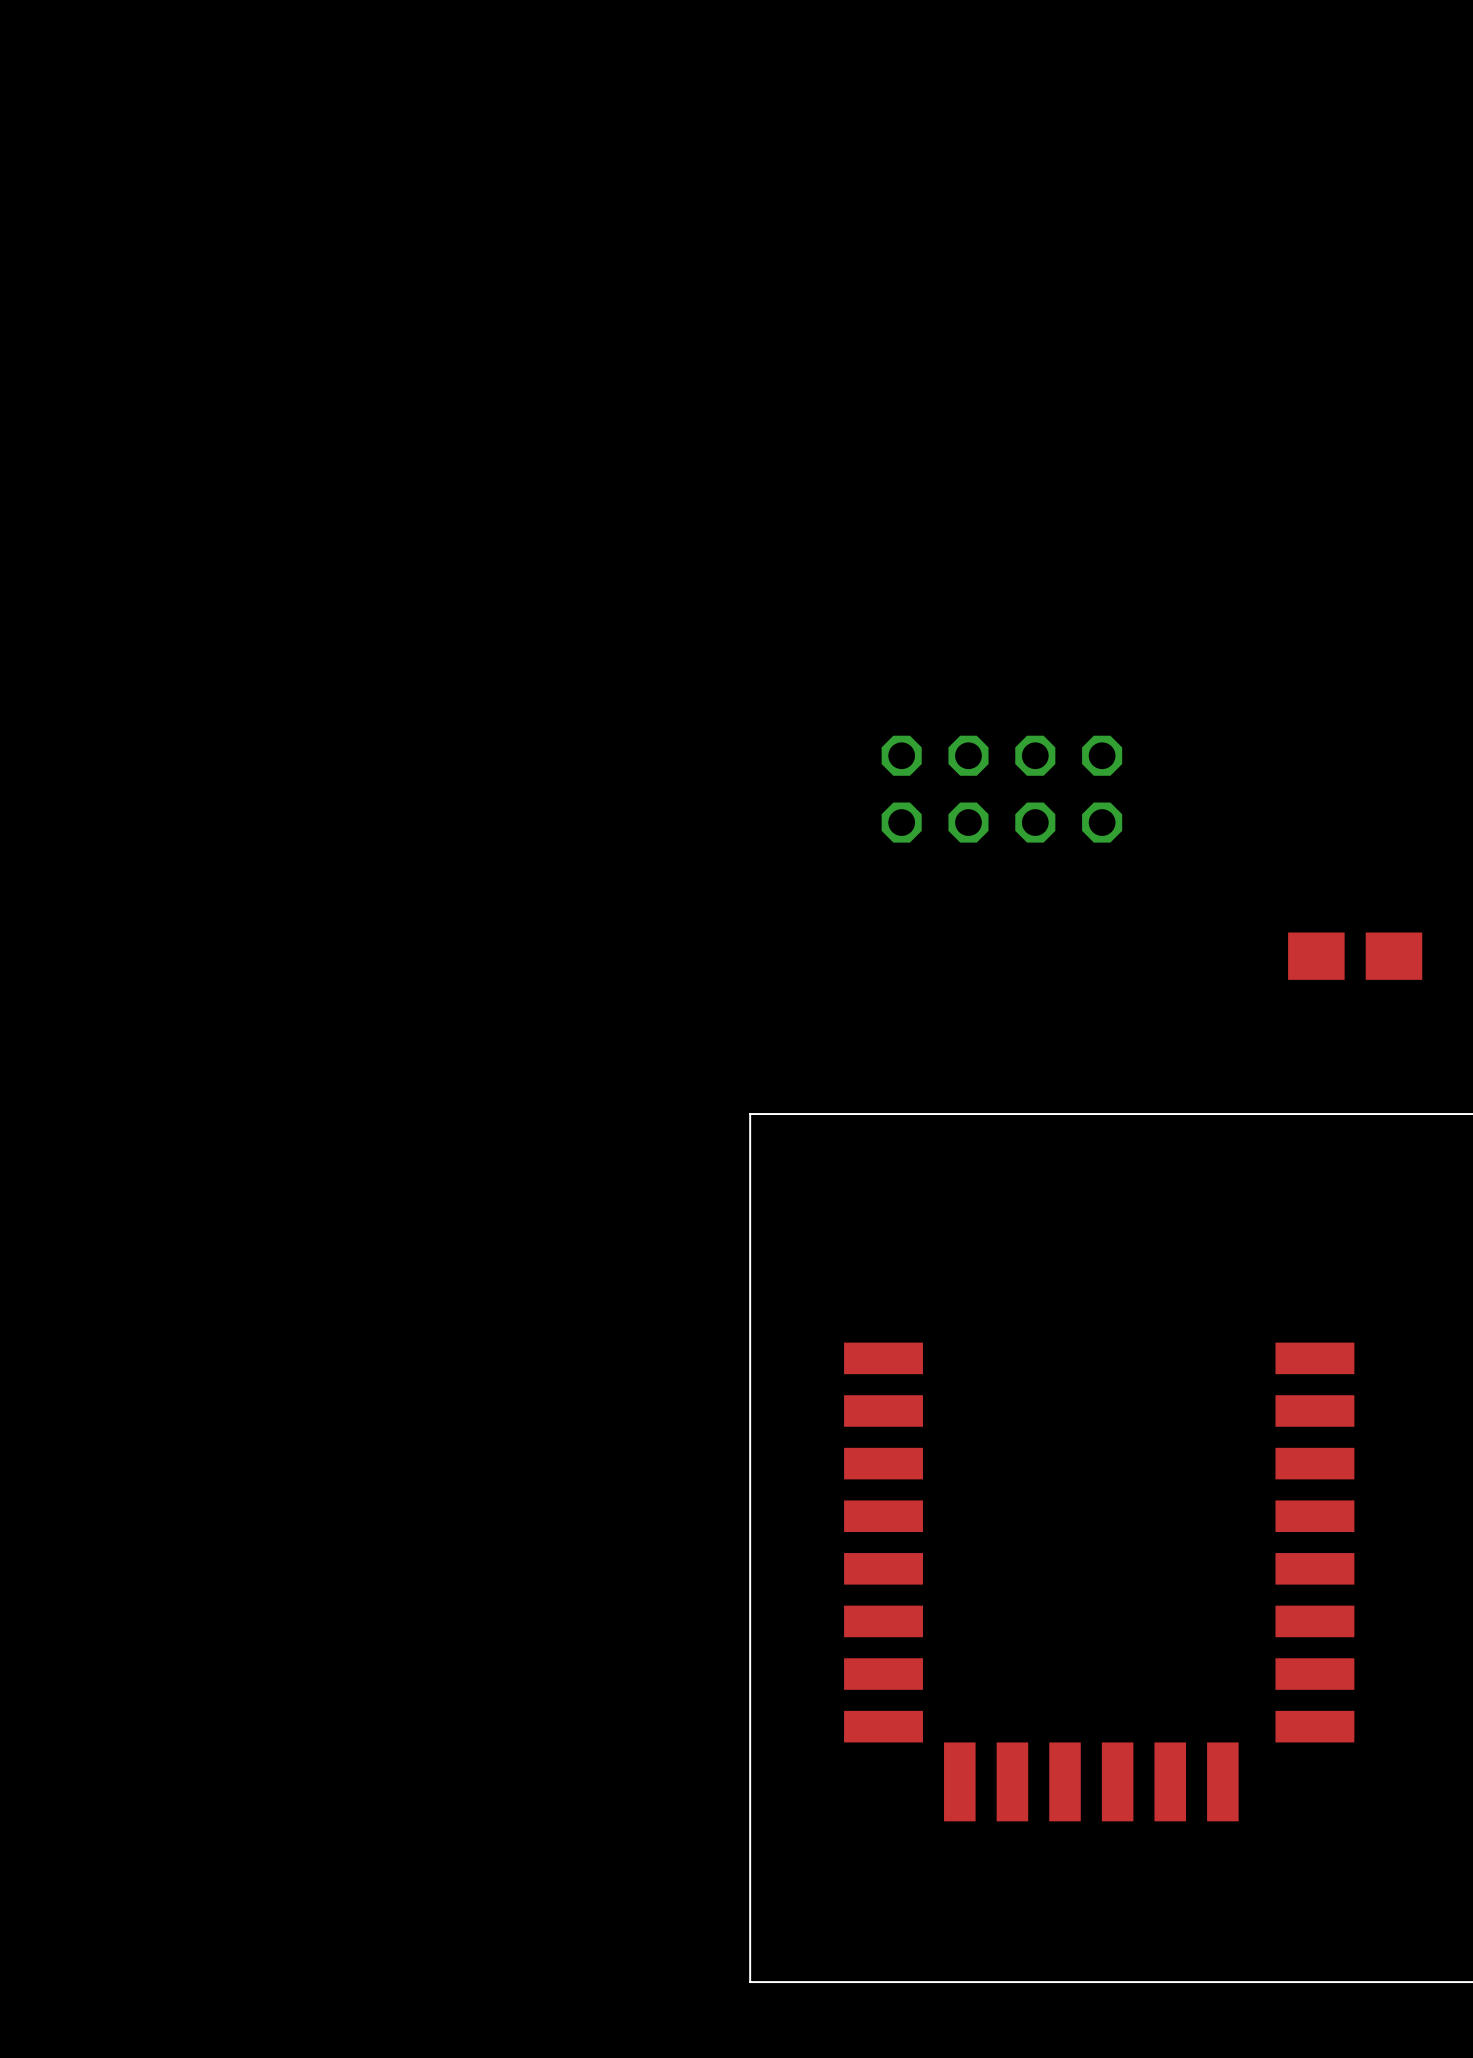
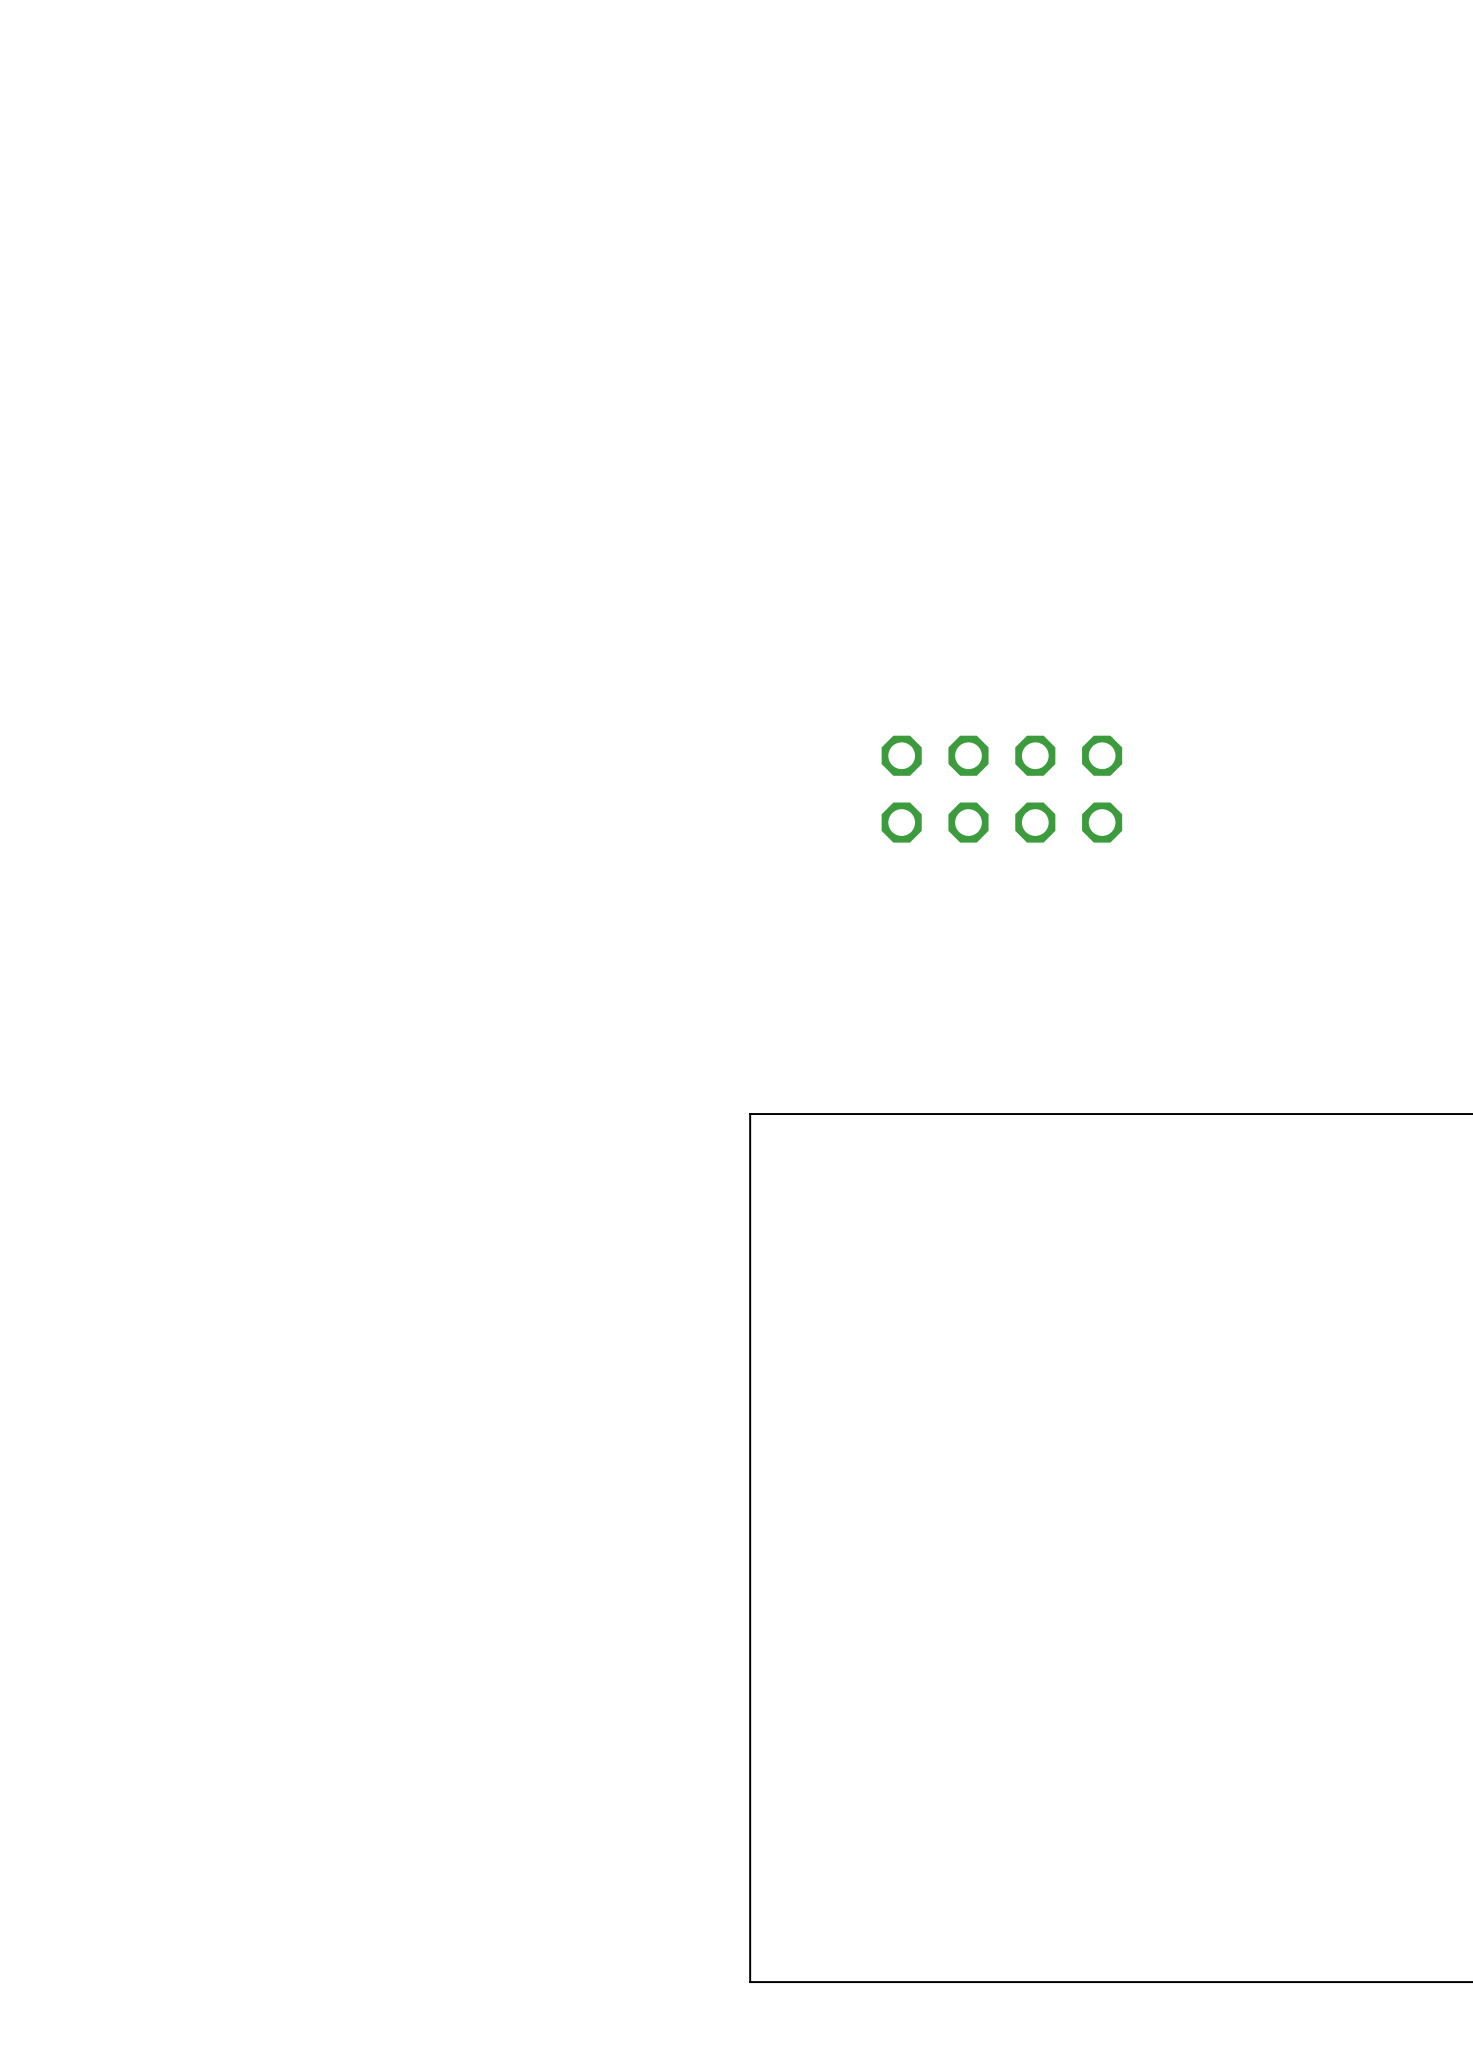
part: (1355, 956) -> none
part: (1099, 1581) -> none

